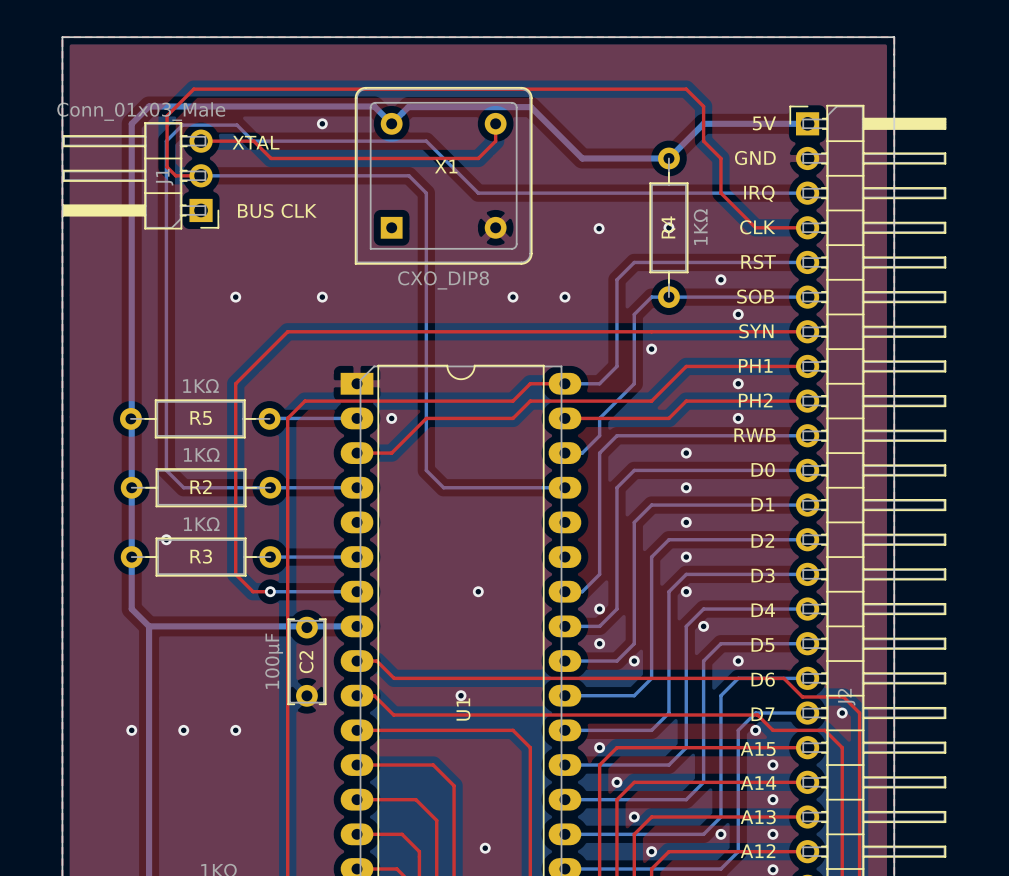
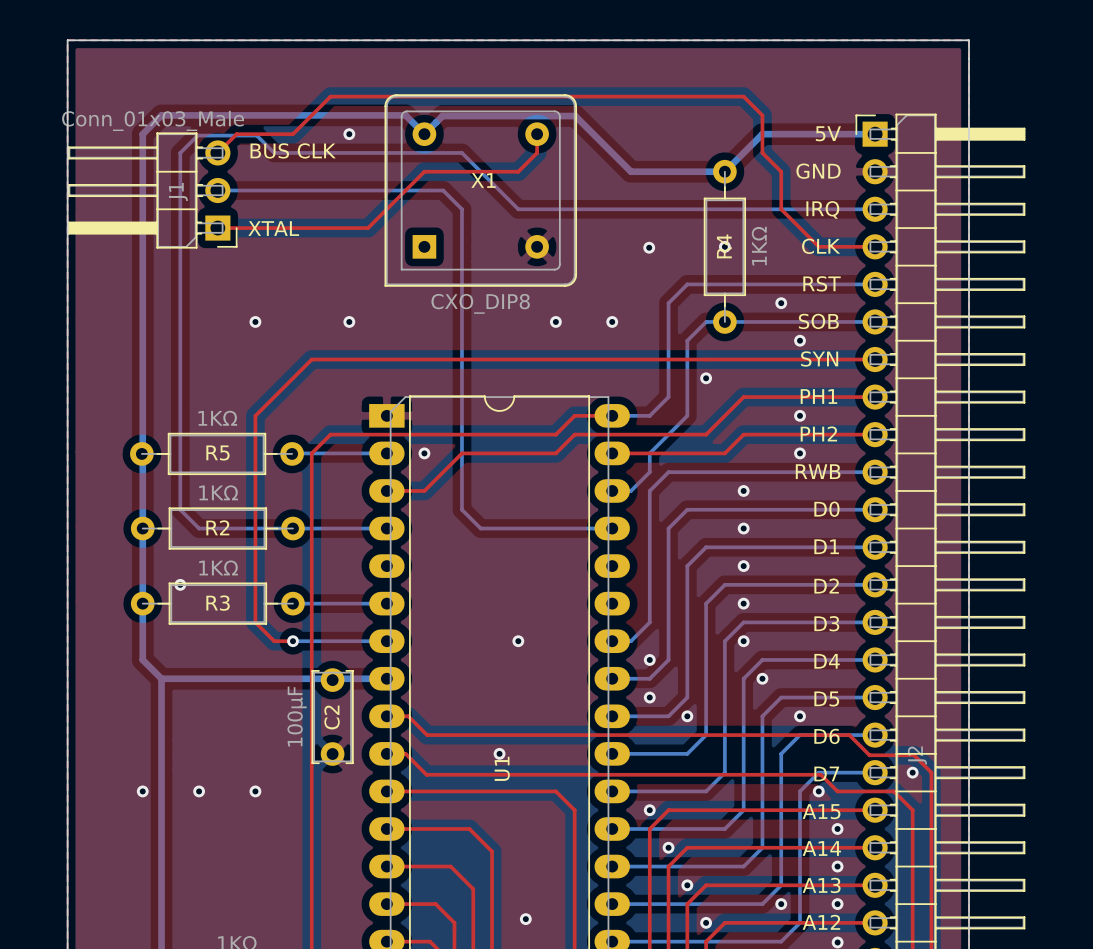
top track: (305, 89) (193, 89) (167, 115) (167, 167) (175, 175) (201, 175) -> (330, 96) (292, 134) (236, 134) (217, 152)
top track: (201, 141) (253, 141) (271, 158) (391, 158) -> (217, 228) (368, 228) (424, 171)
text position: XTAL (256, 142) -> XTAL (273, 228)
text position: BUS CLK (277, 210) -> BUS CLK (293, 150)

